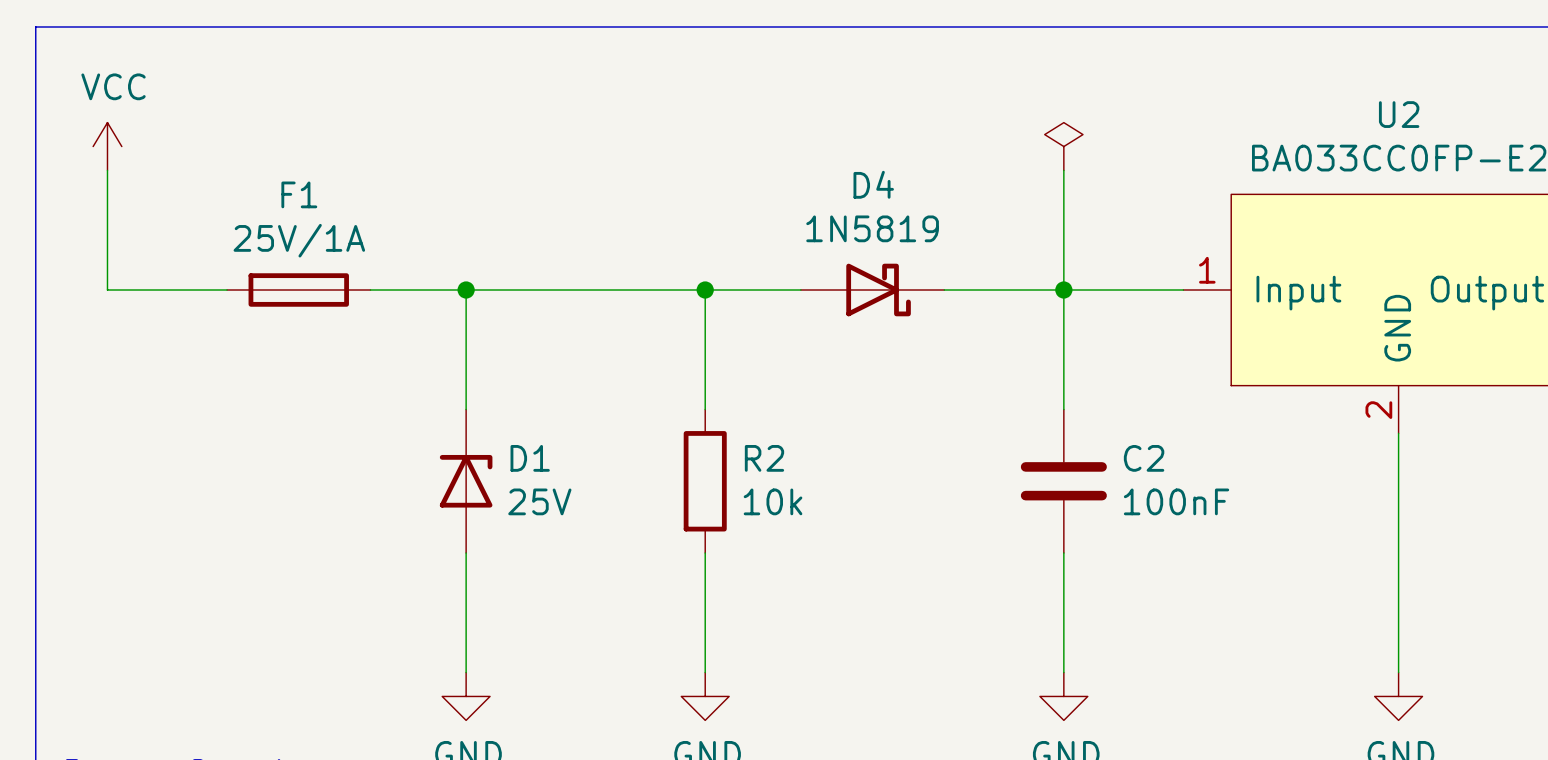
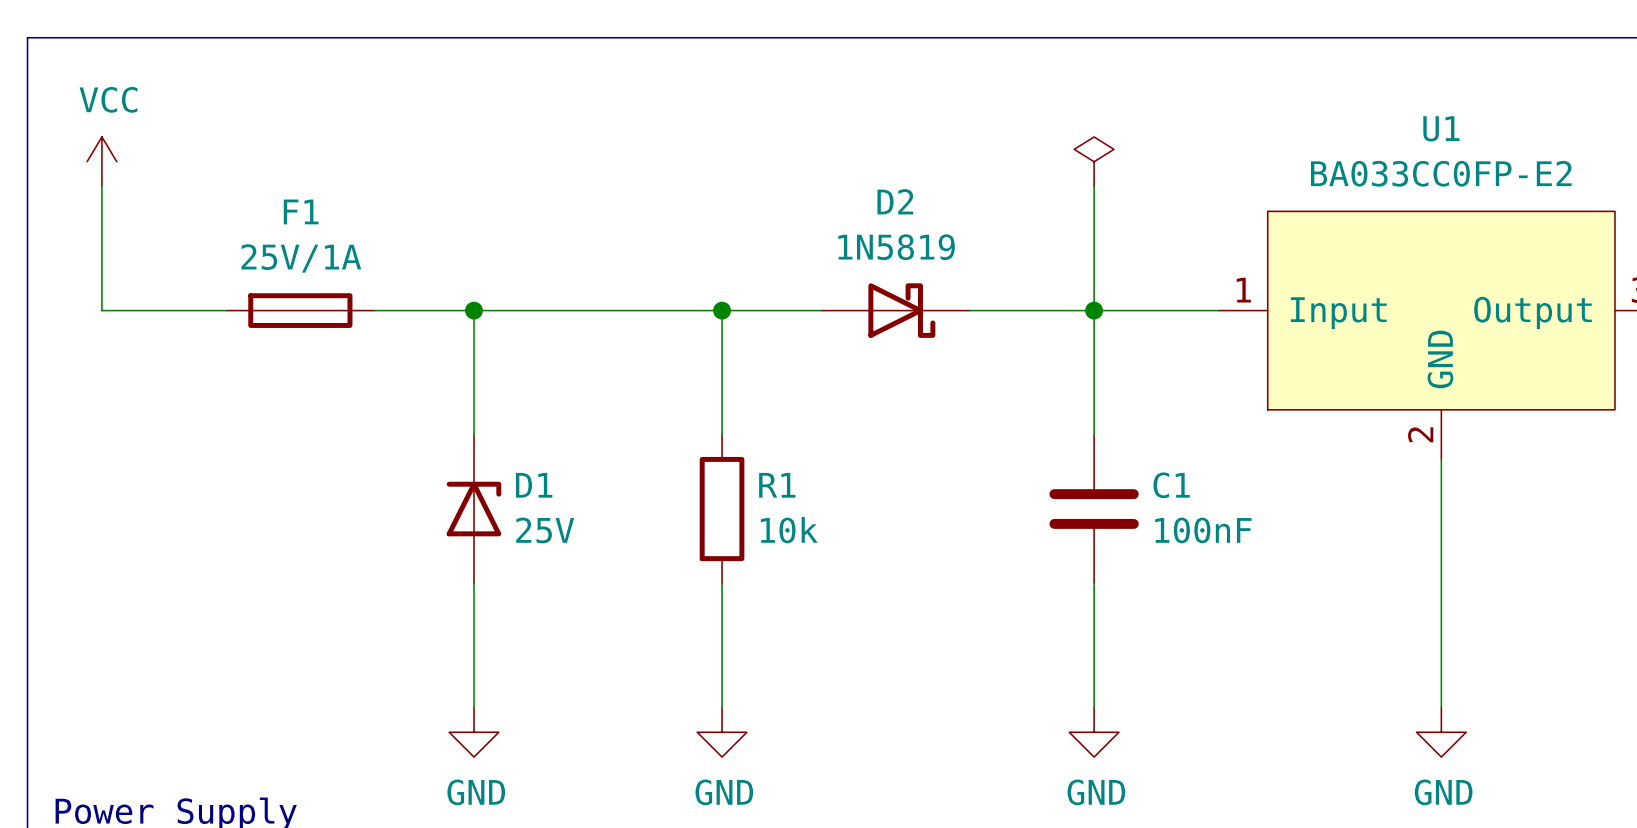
U2 name: U2 (1399, 114) -> U1 (1441, 128)
D4 name: D4 (873, 184) -> D2 (895, 201)
R2 name: R2 (764, 458) -> R1 (777, 485)
C2 name: C2 (1144, 458) -> C1 (1171, 485)

